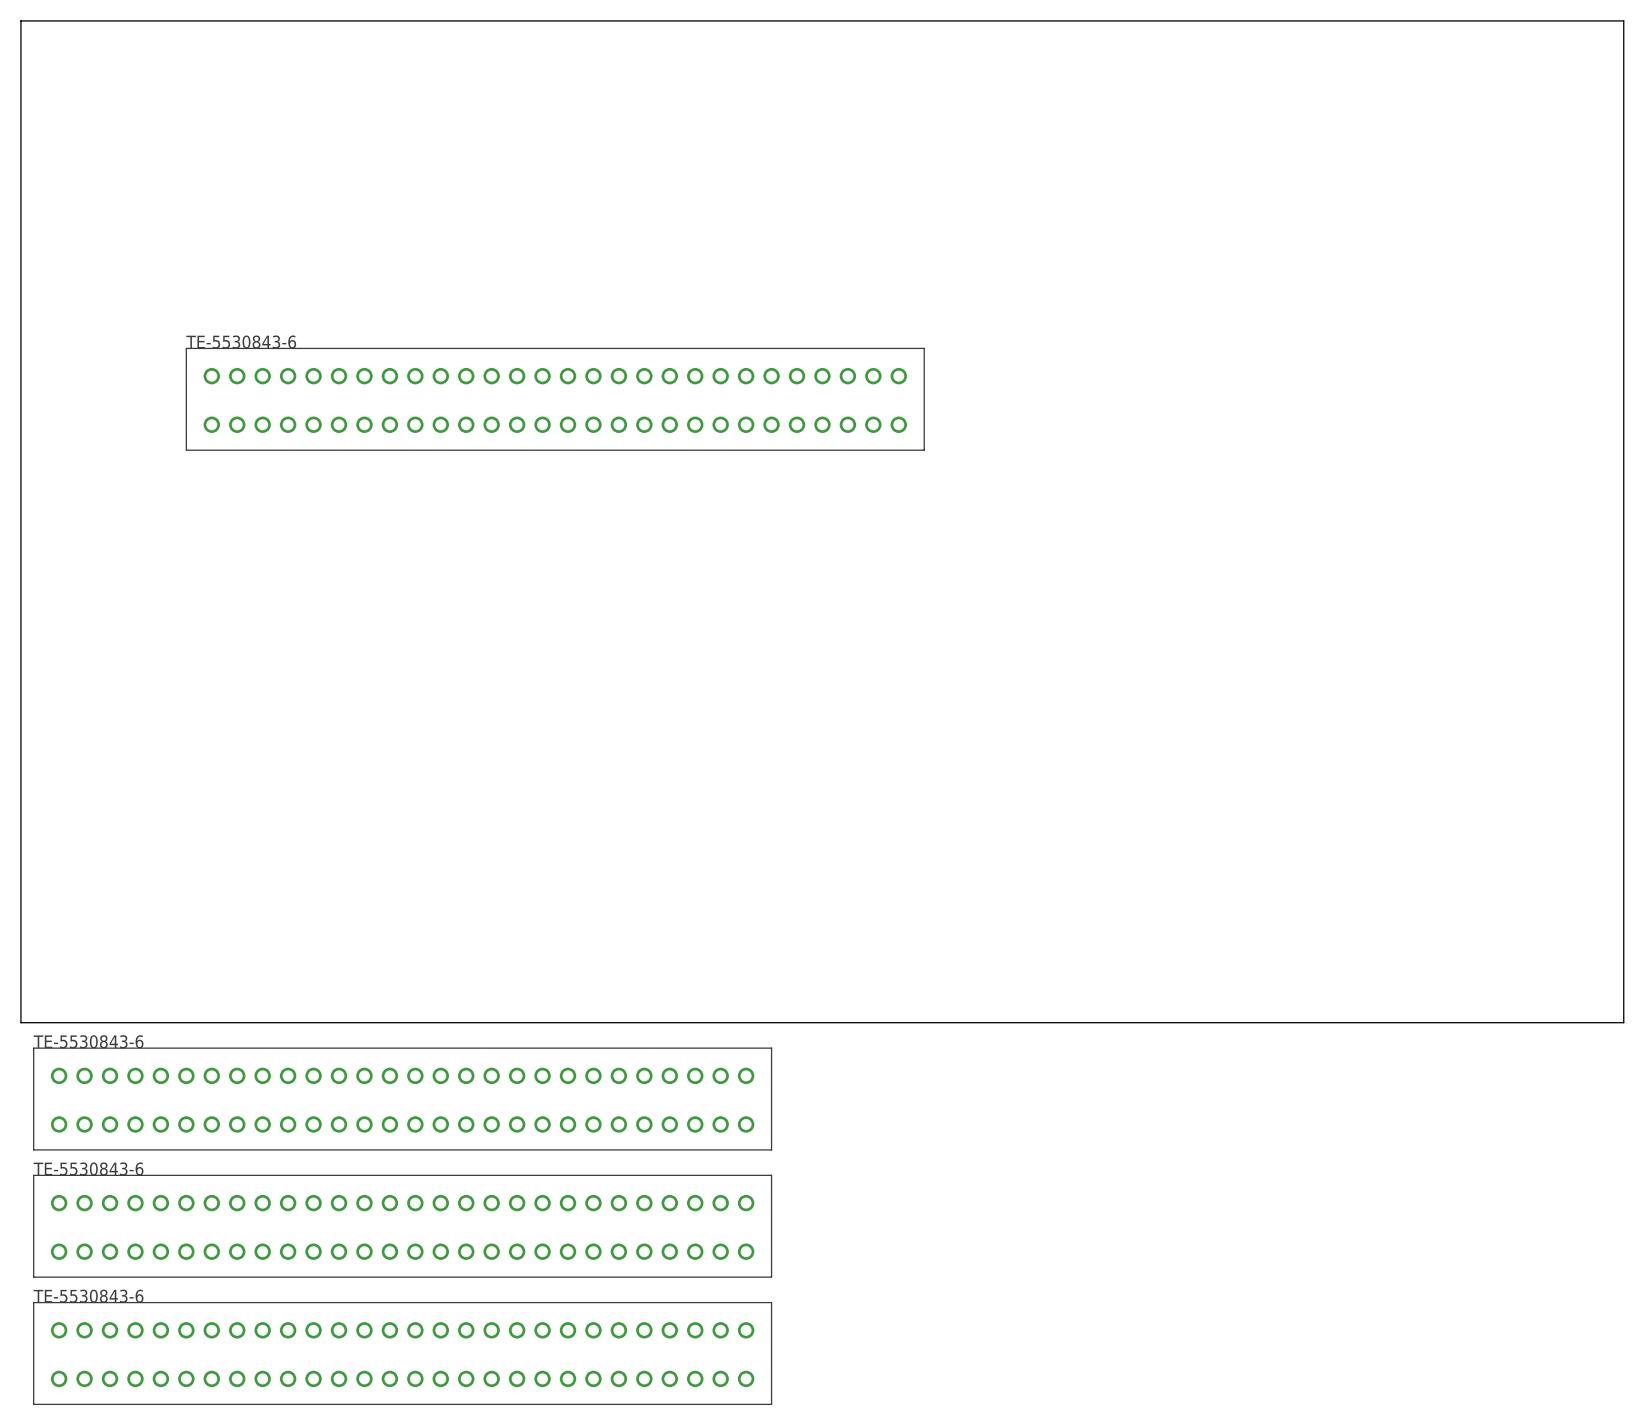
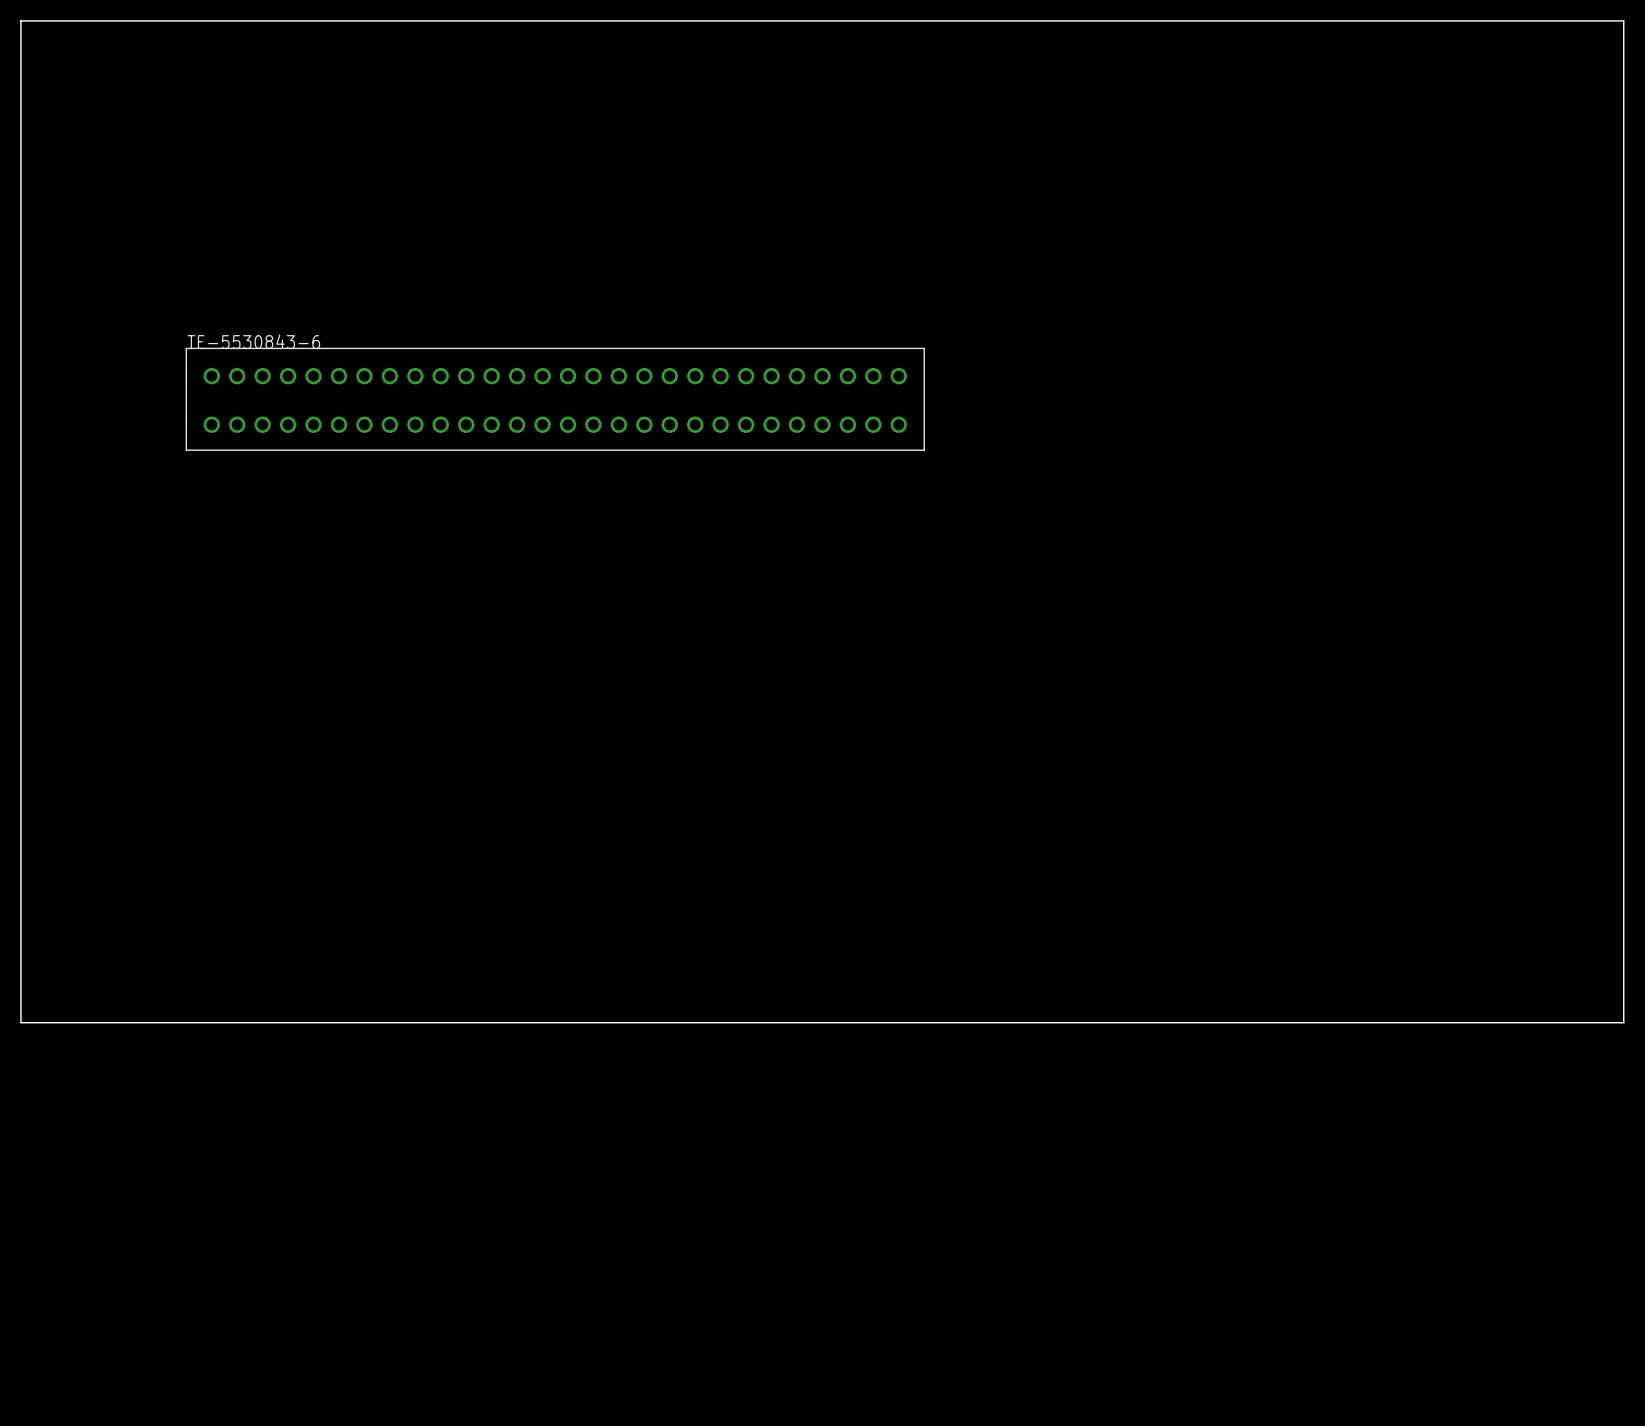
part: (402, 1099) -> none
part: (402, 1226) -> none
part: (402, 1353) -> none

